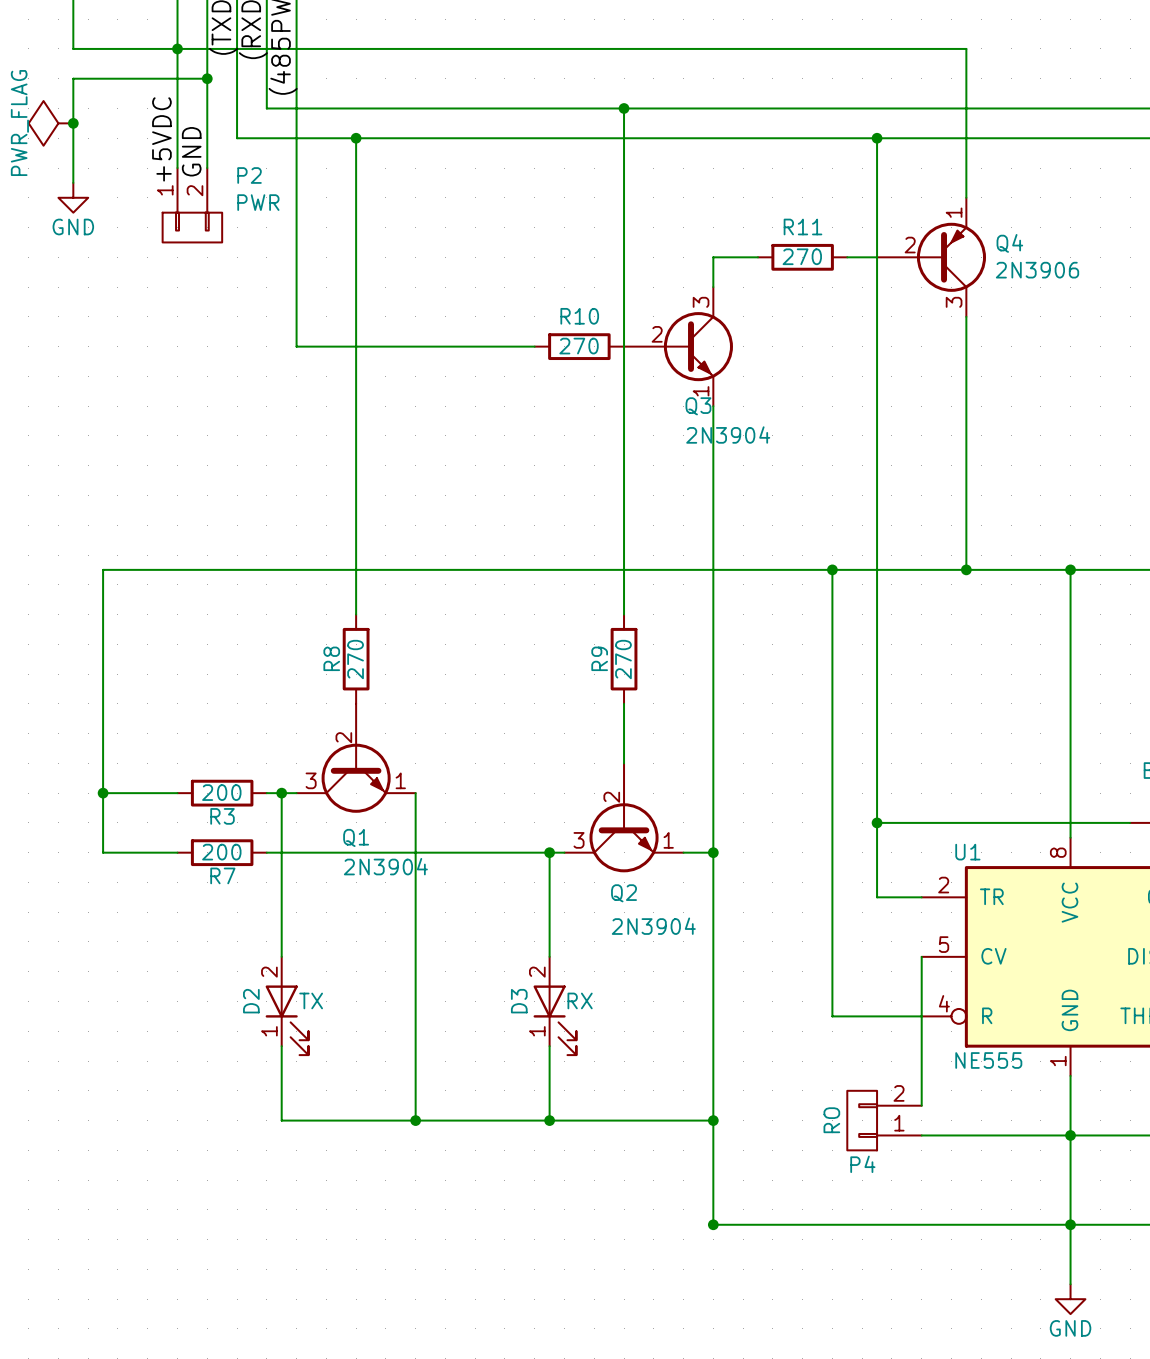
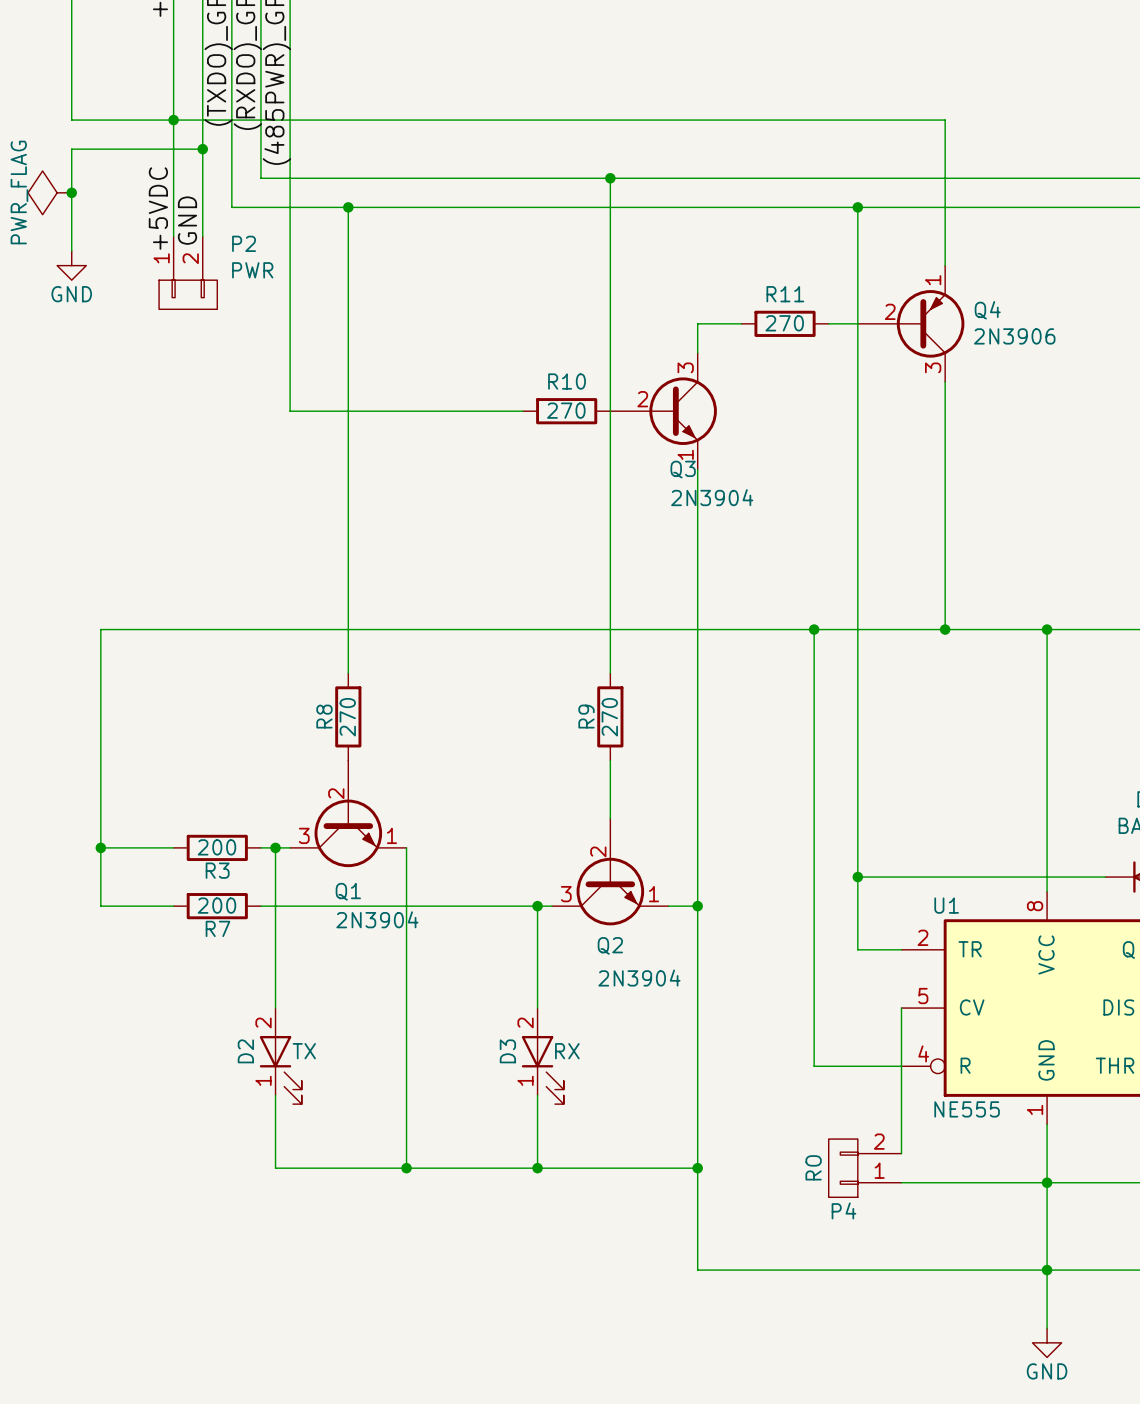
junction: (713, 1224) -> none

